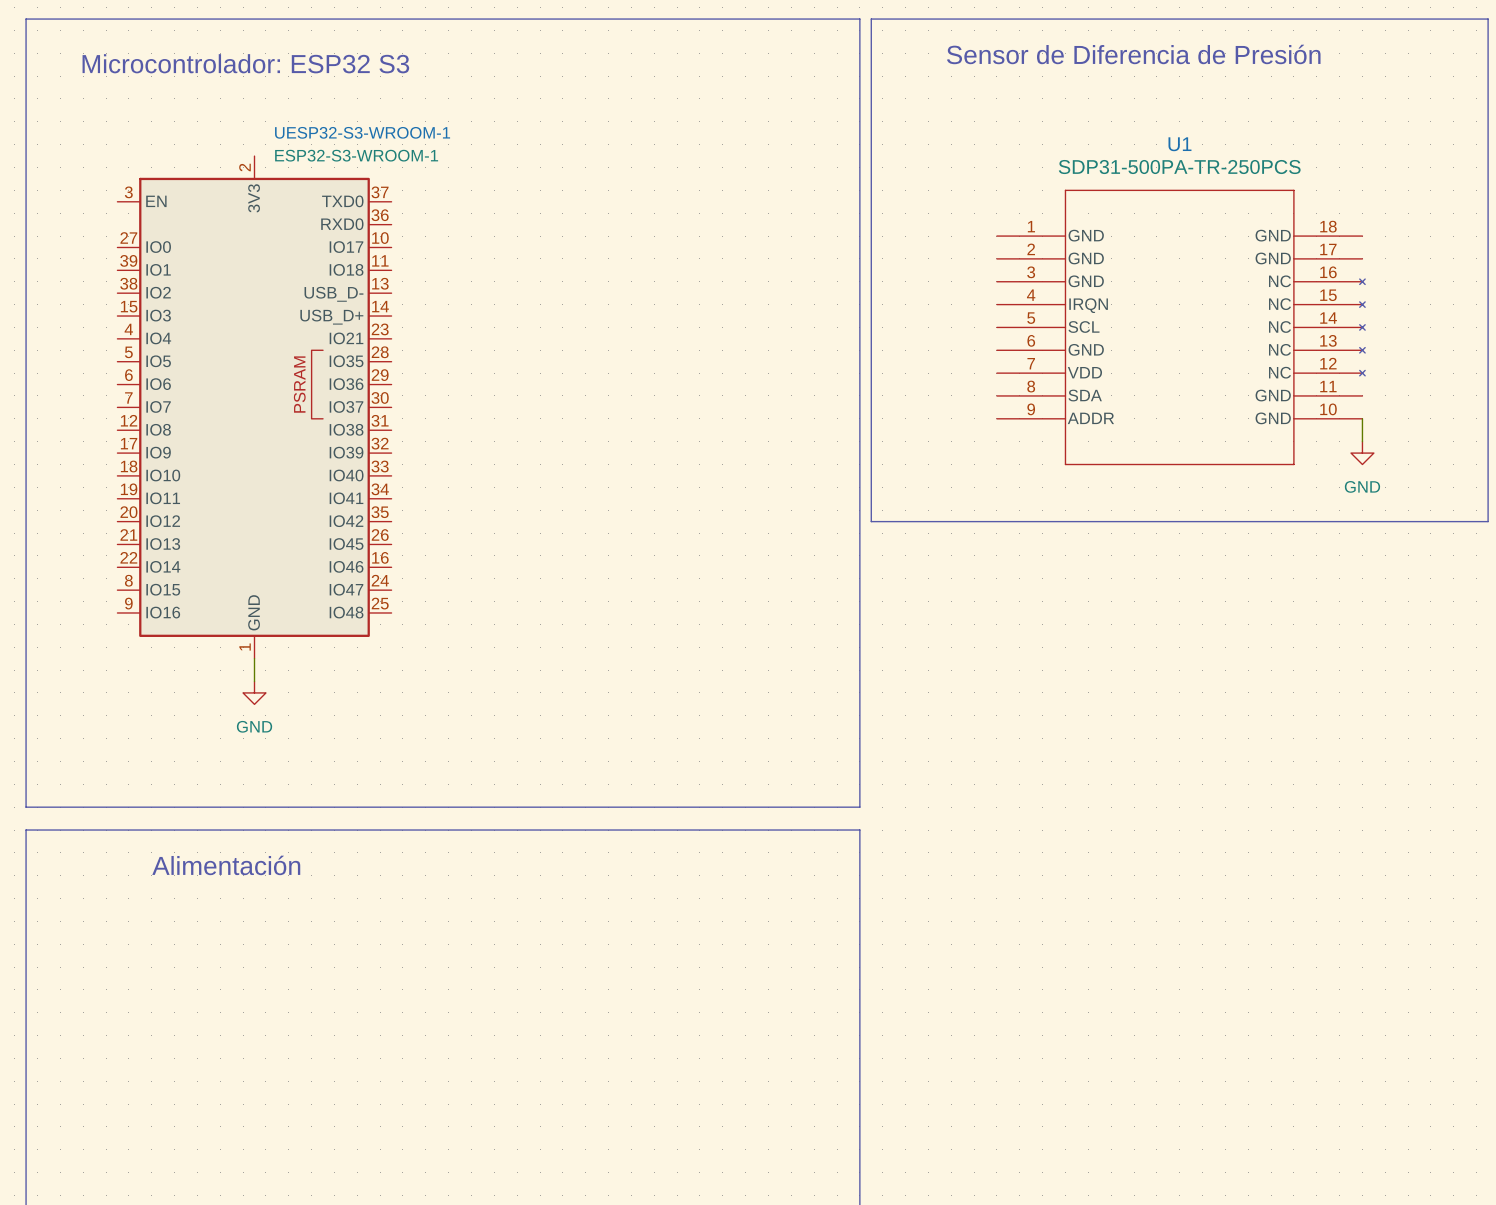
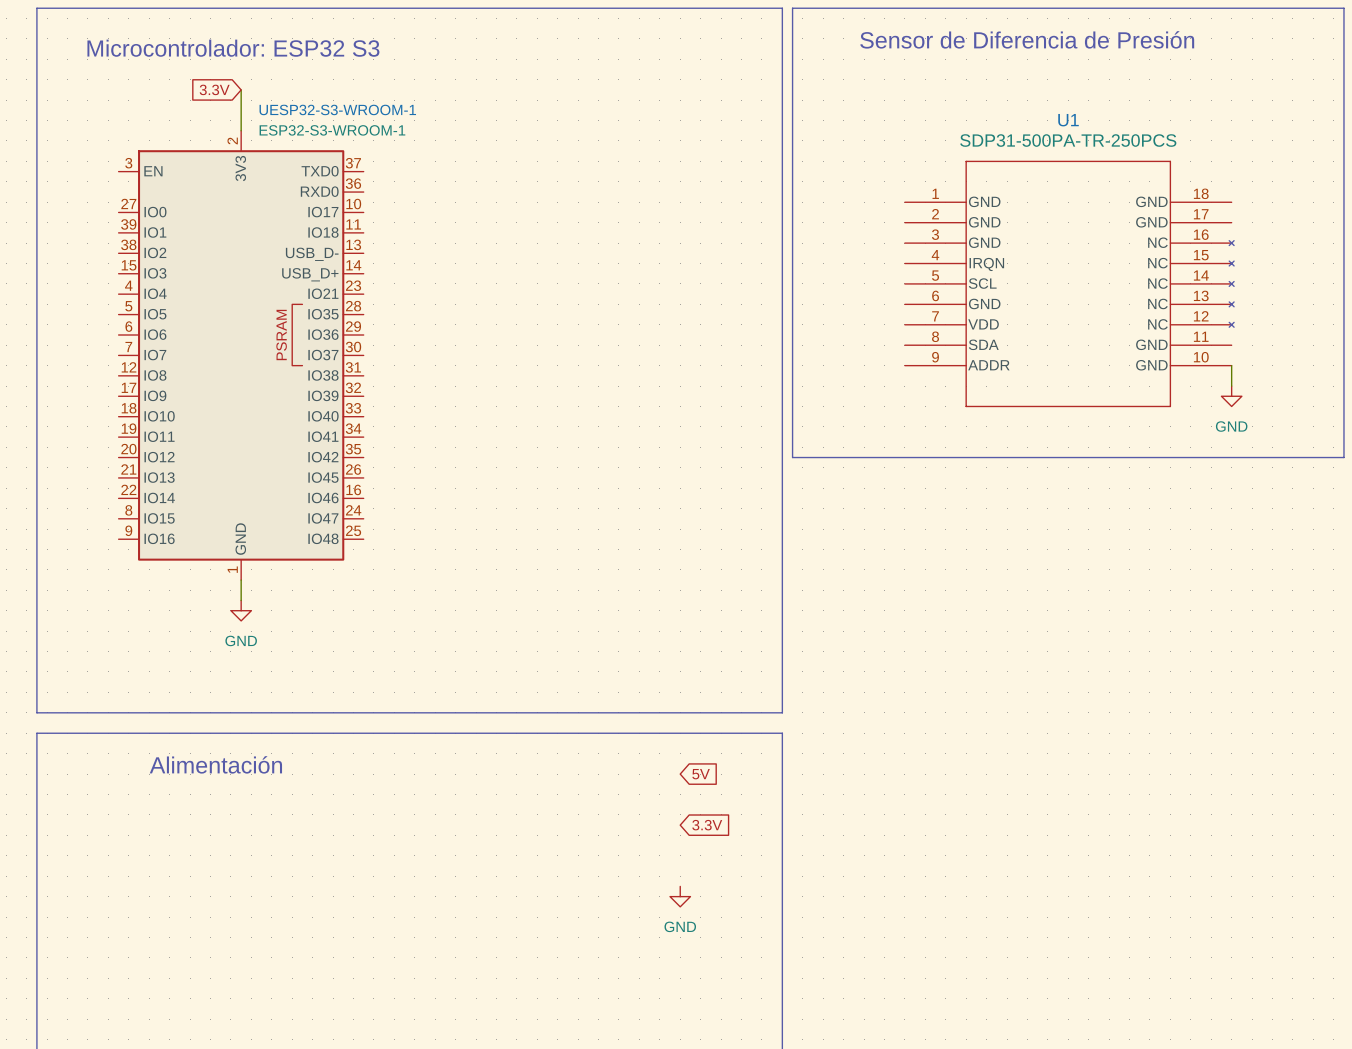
global label: none -> 3.3V (214, 89)
wire: none -> (241, 89) (241, 130)
global label: none -> 5V (701, 774)
global label: none -> 3.3V (707, 825)
power symbol: none -> GND (680, 896)

